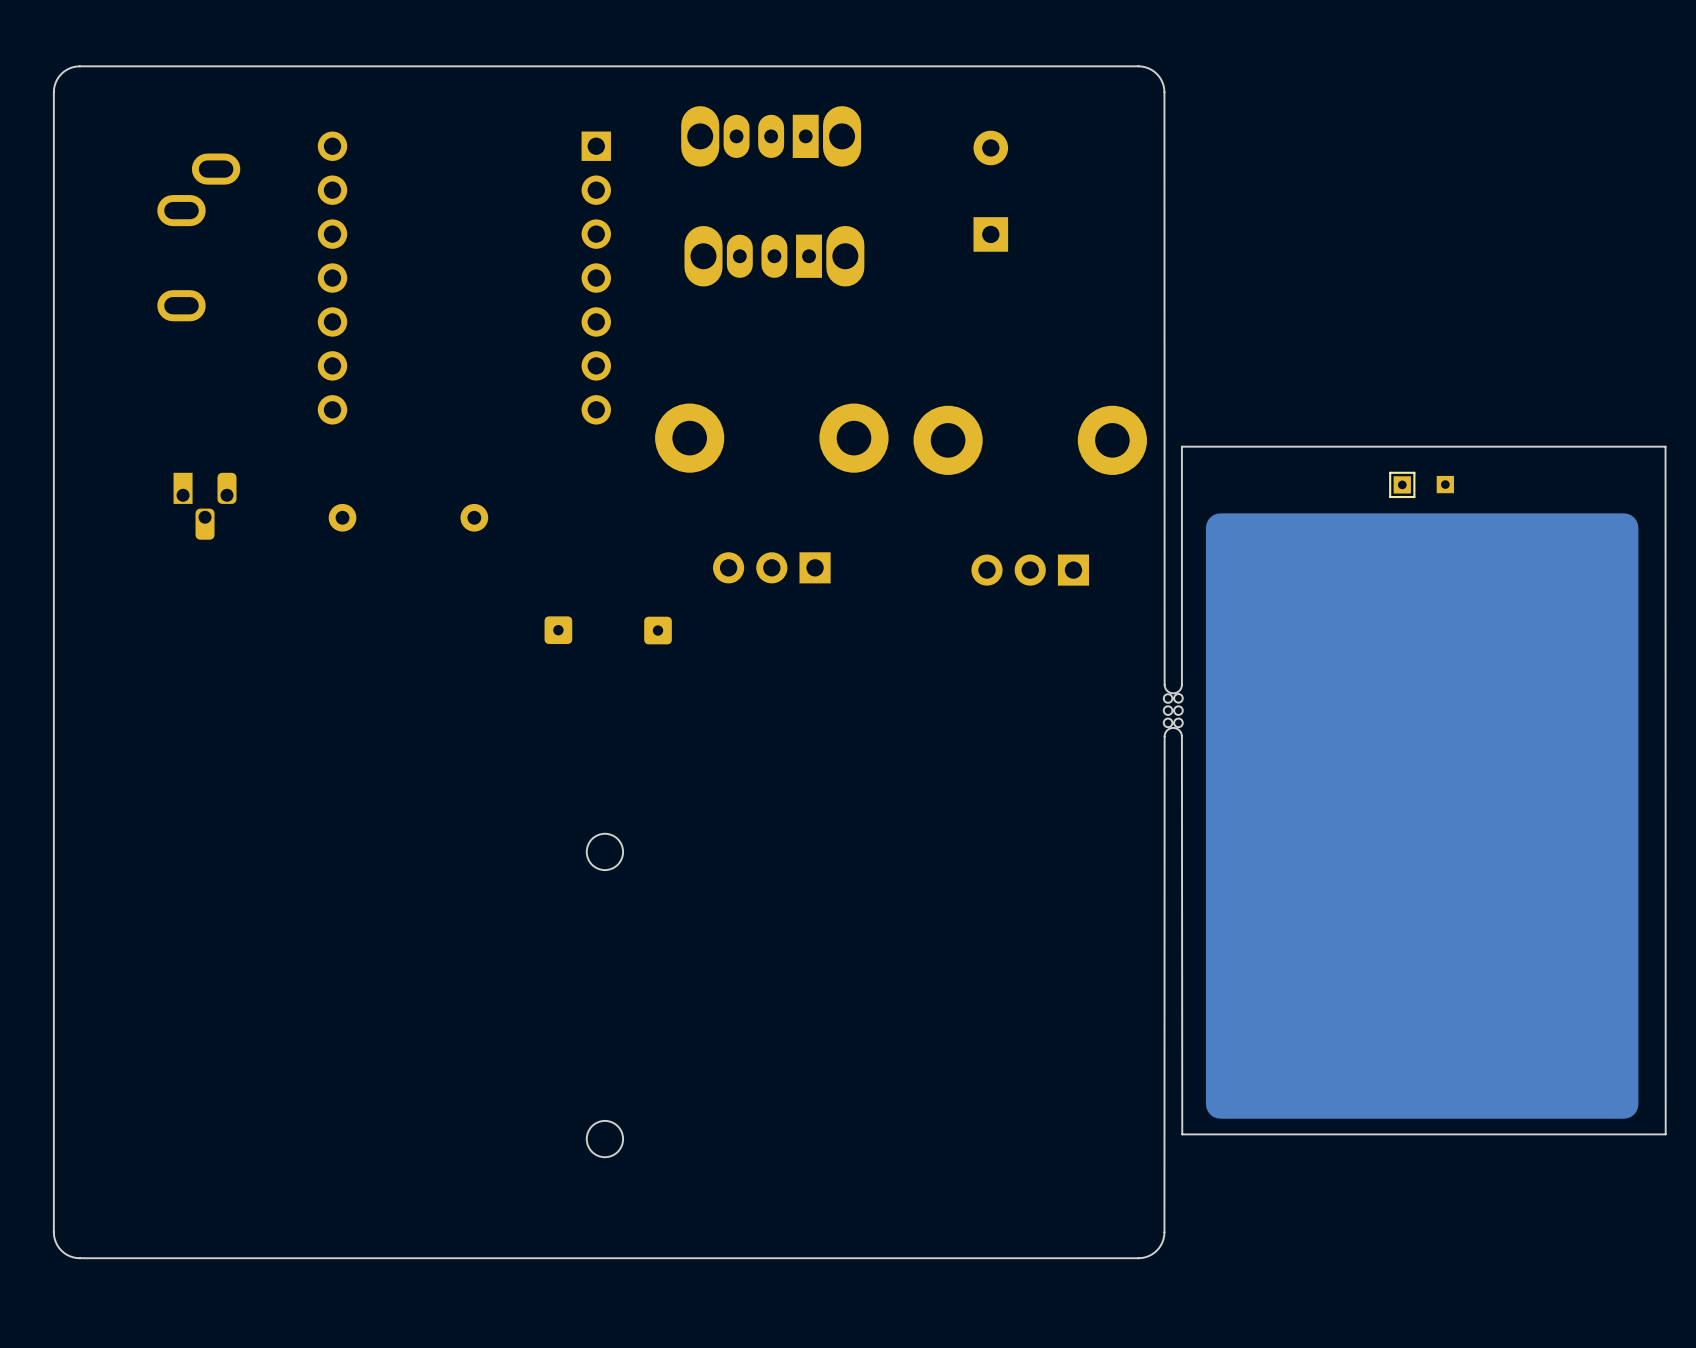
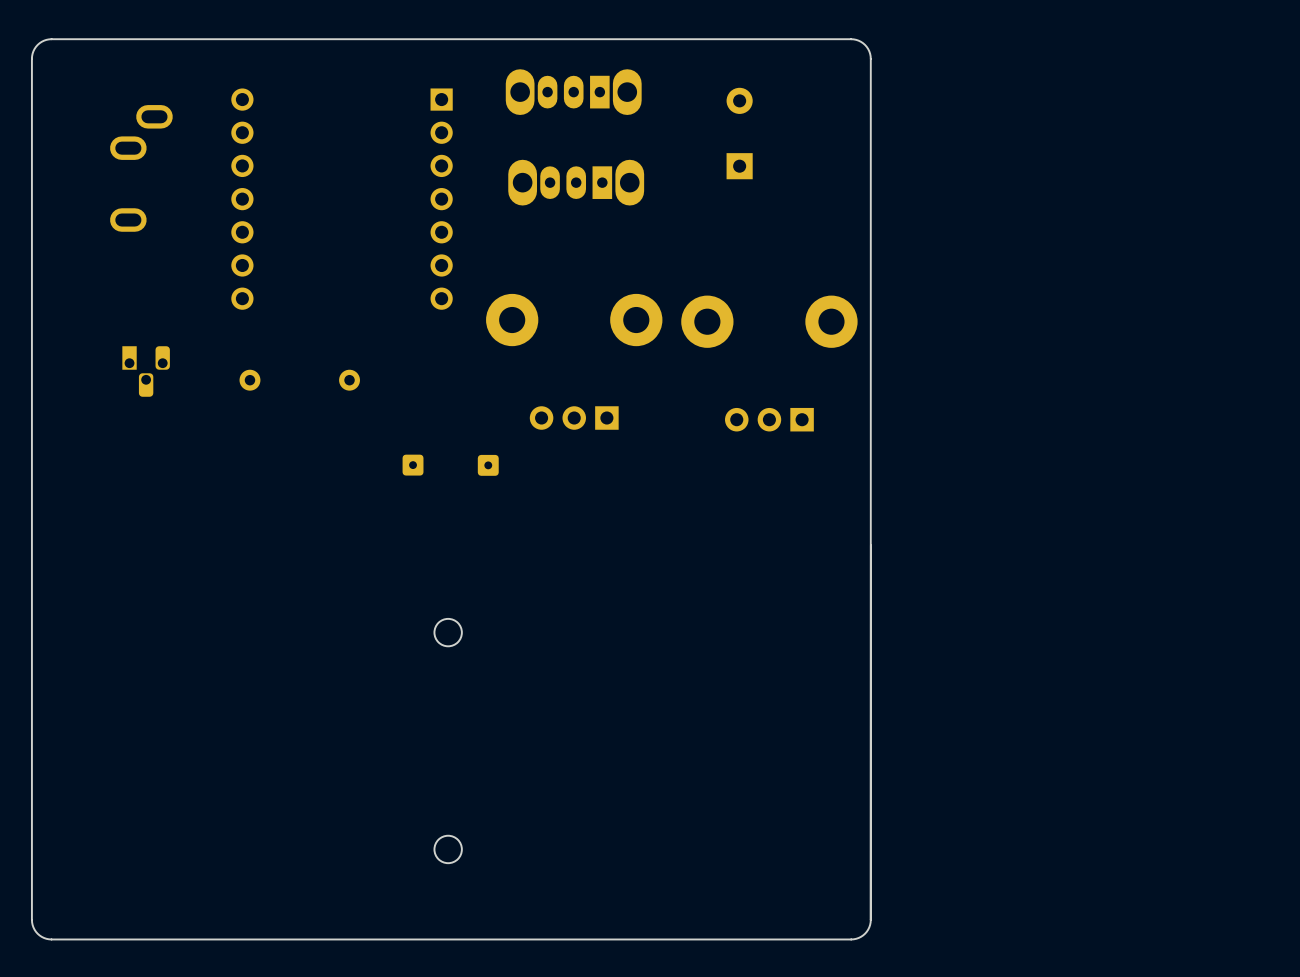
board edge: (1164, 92) (1164, 684) -> (870, 58) (870, 919)
part: (1402, 484) -> none
part: (1445, 484) -> none
board edge: (1181, 684) (1181, 446) (1665, 446) (1665, 1134) (1182, 1134) (1181, 736) -> none
part: (1173, 710) -> none
part: (1422, 816) -> none

